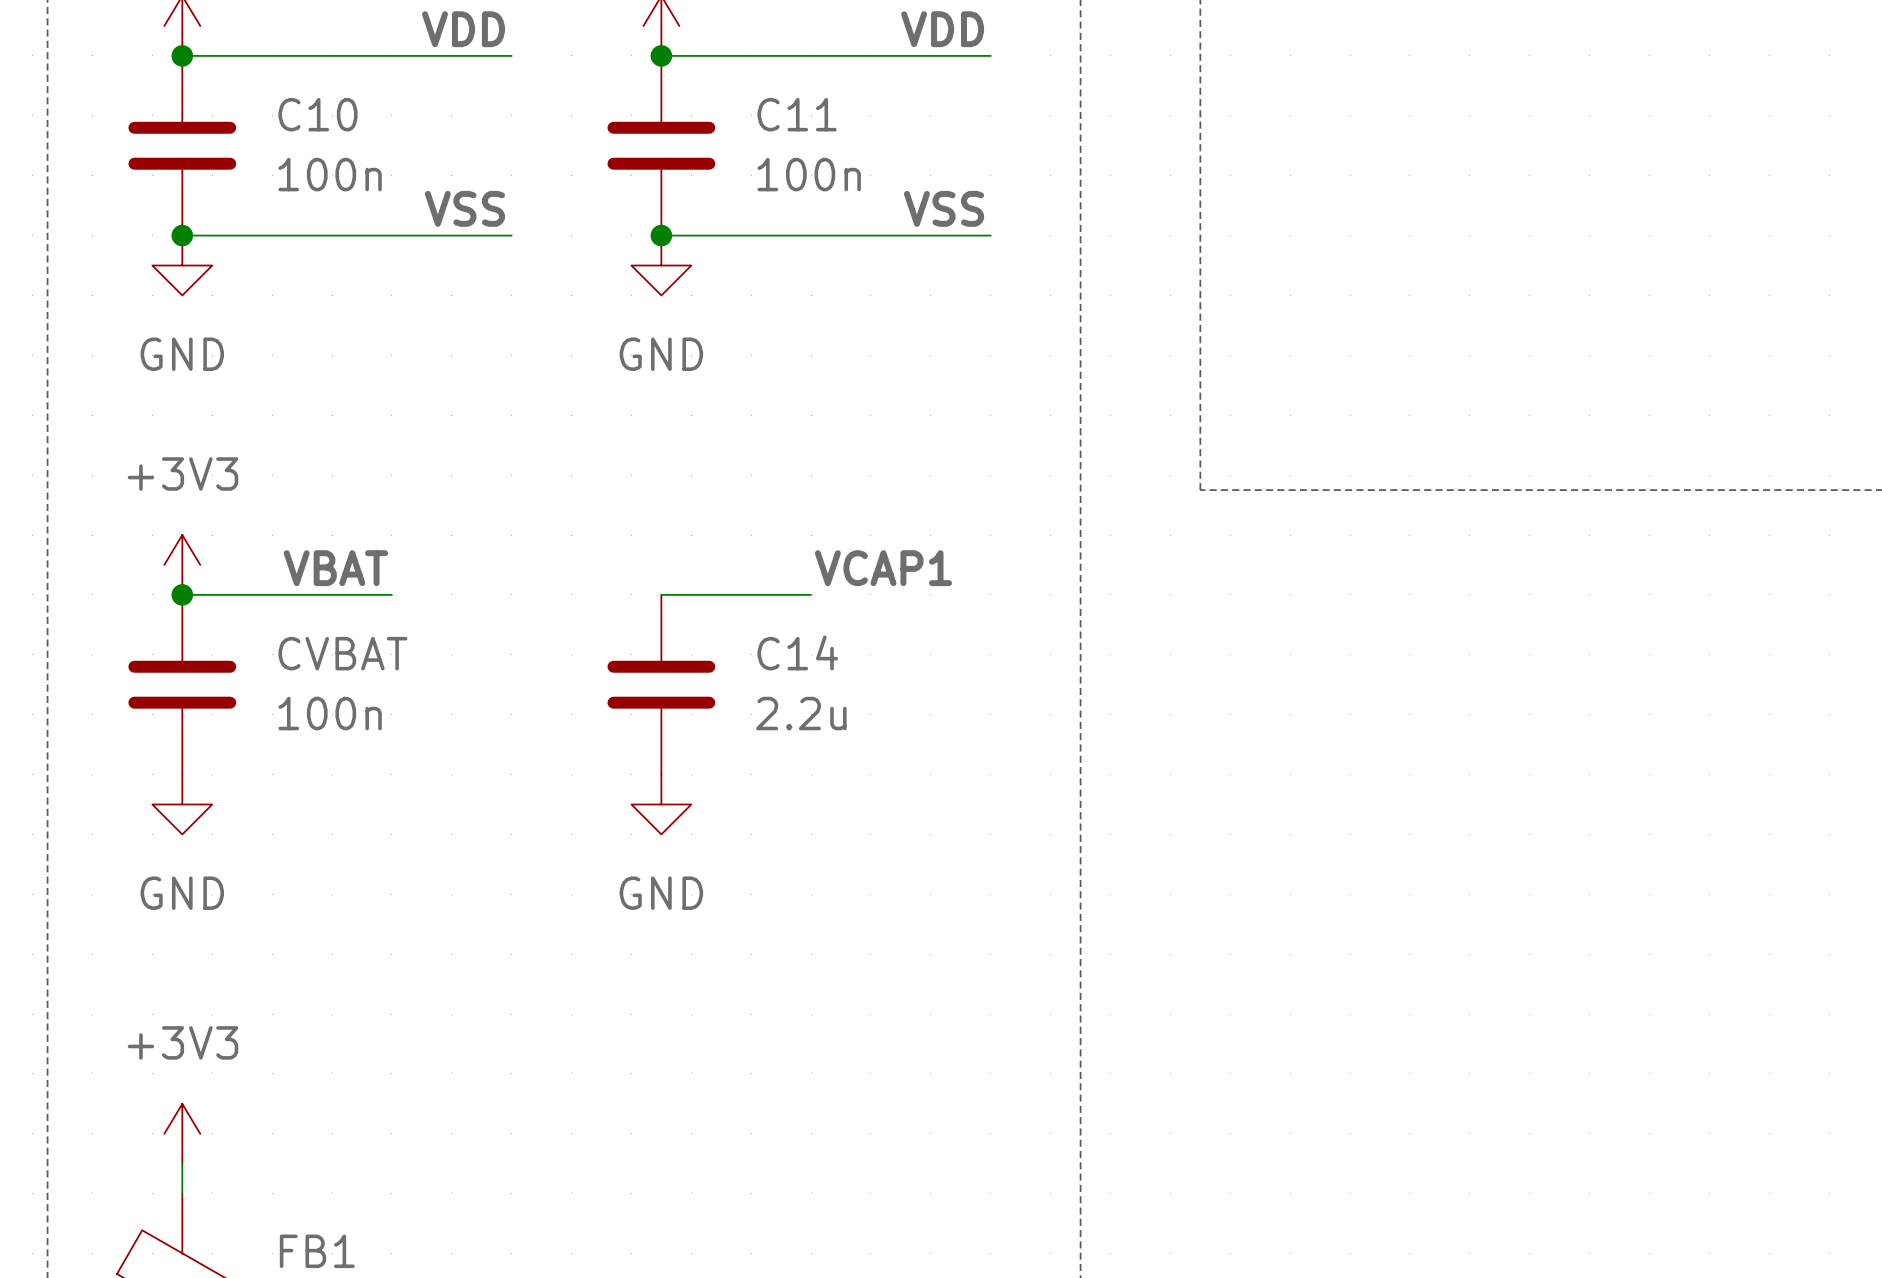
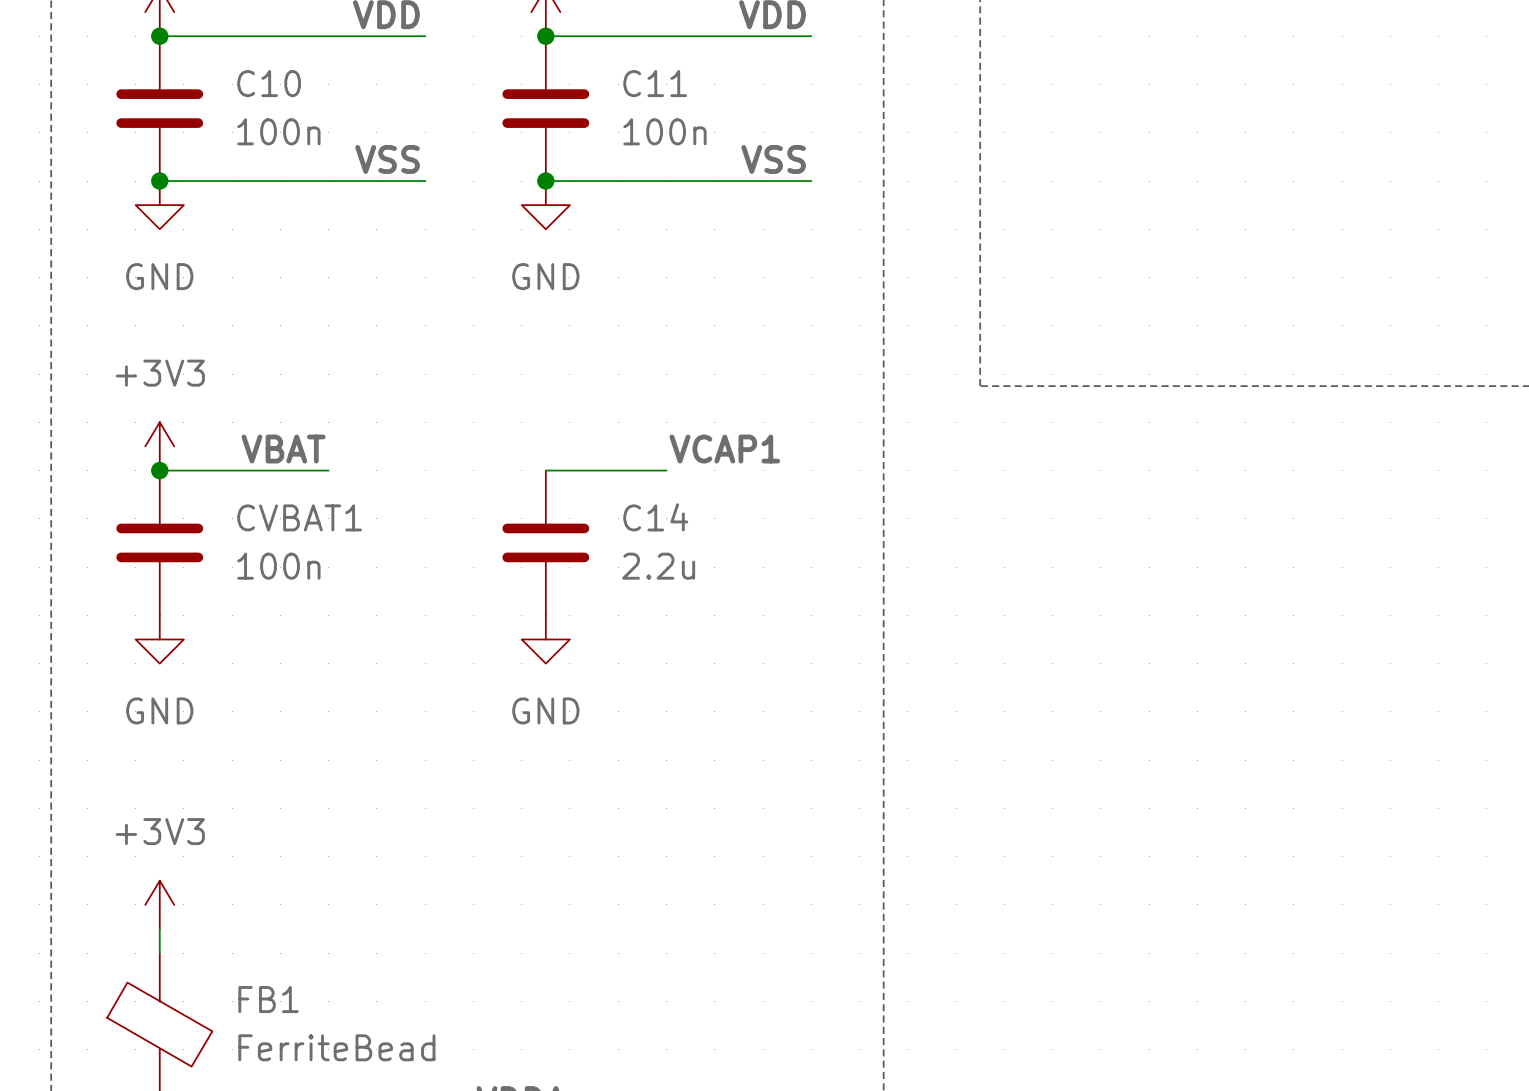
CVBAT name: CVBAT (342, 653) -> CVBAT1 (299, 517)

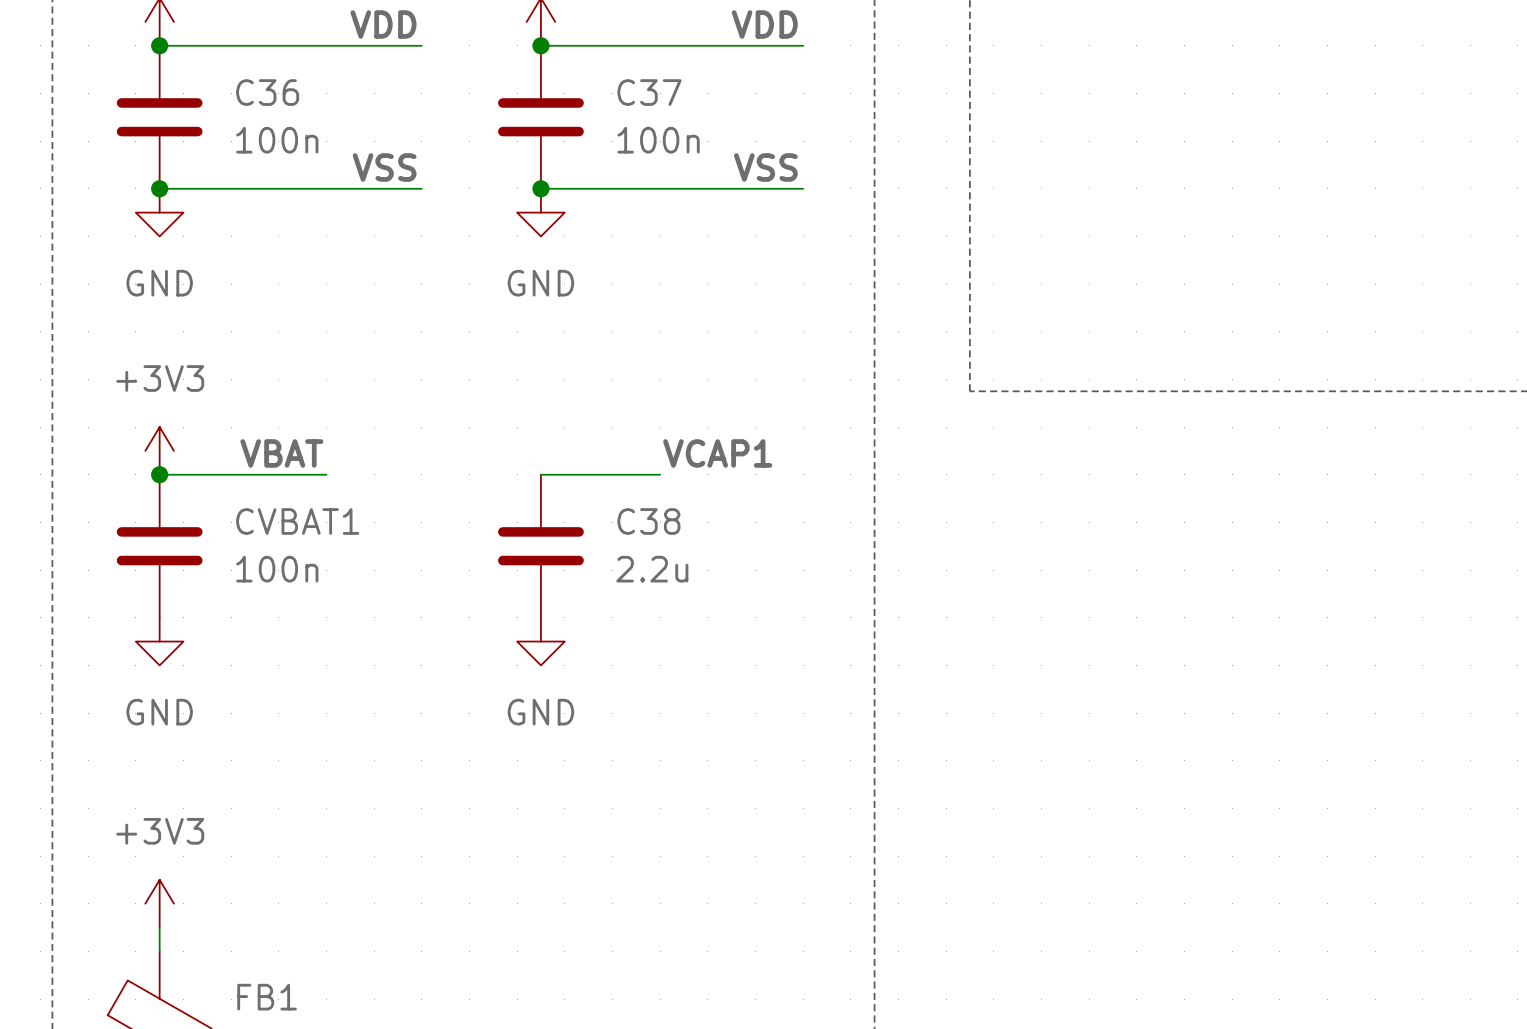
C10 name: C10 (269, 83) -> C36 (267, 92)
C11 name: C11 (655, 83) -> C37 (649, 92)
C14 name: C14 (655, 517) -> C38 (648, 521)

